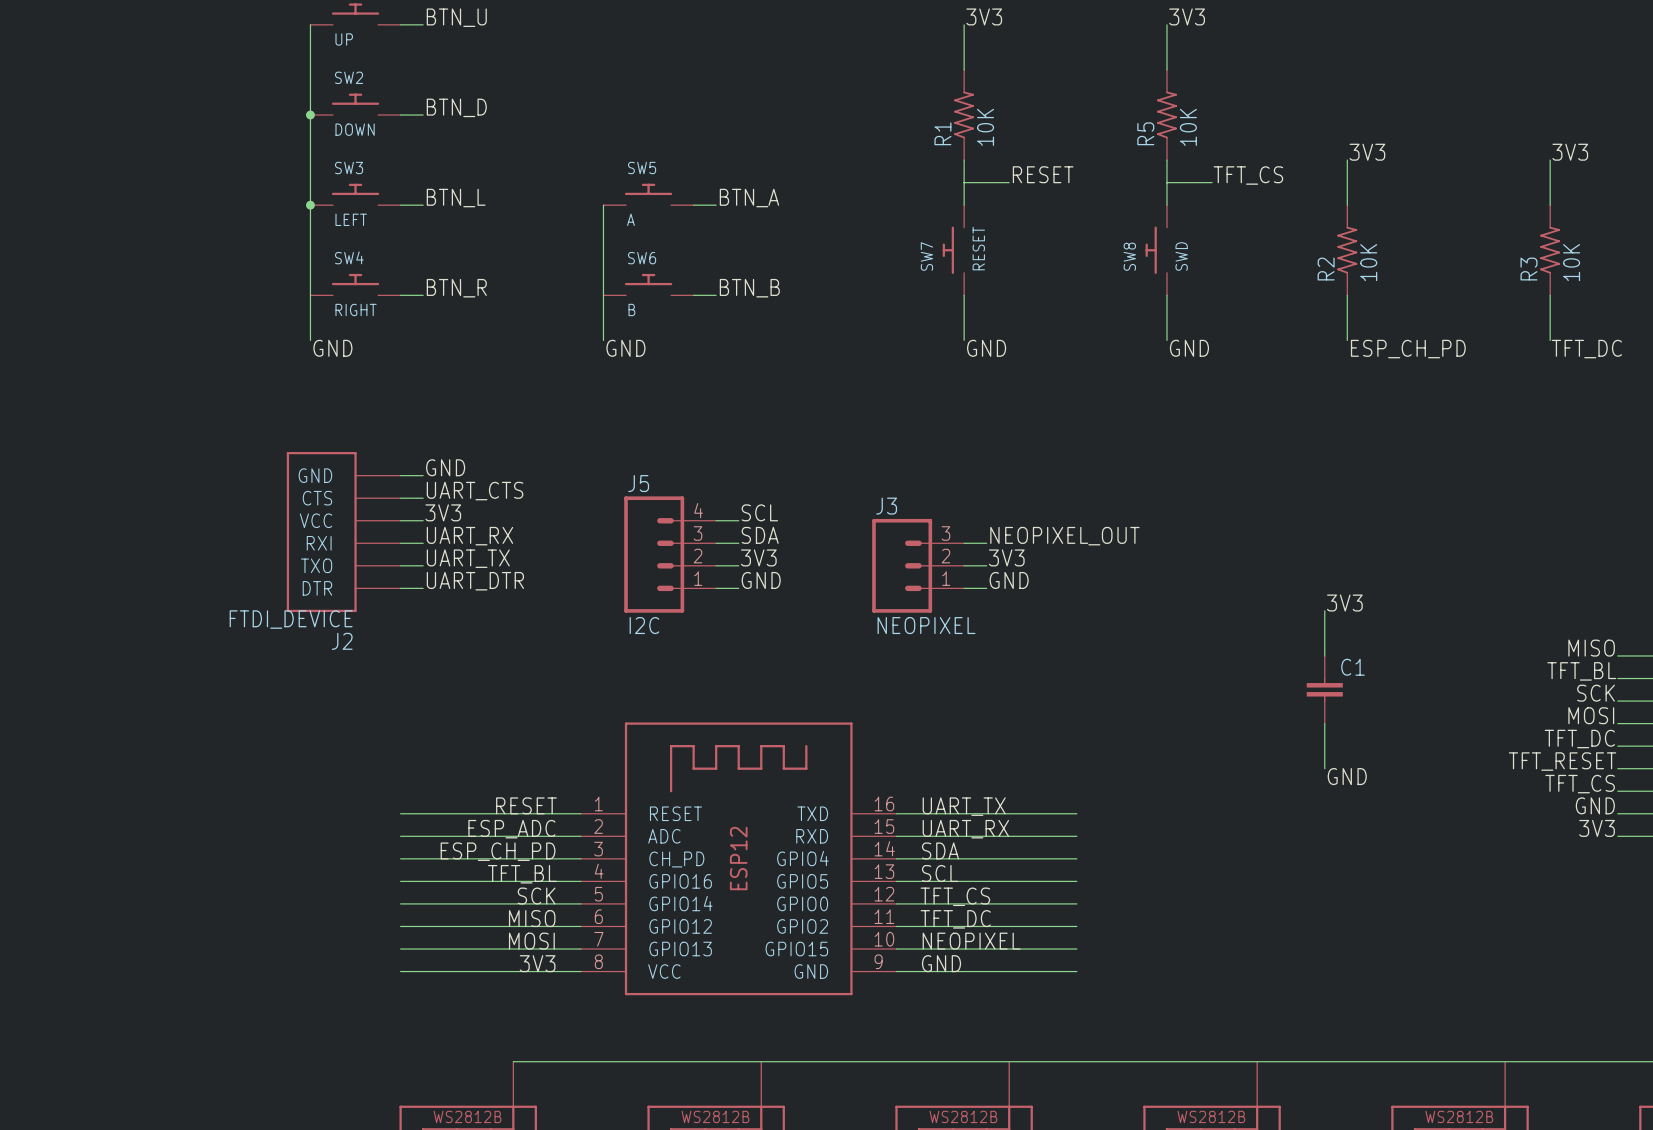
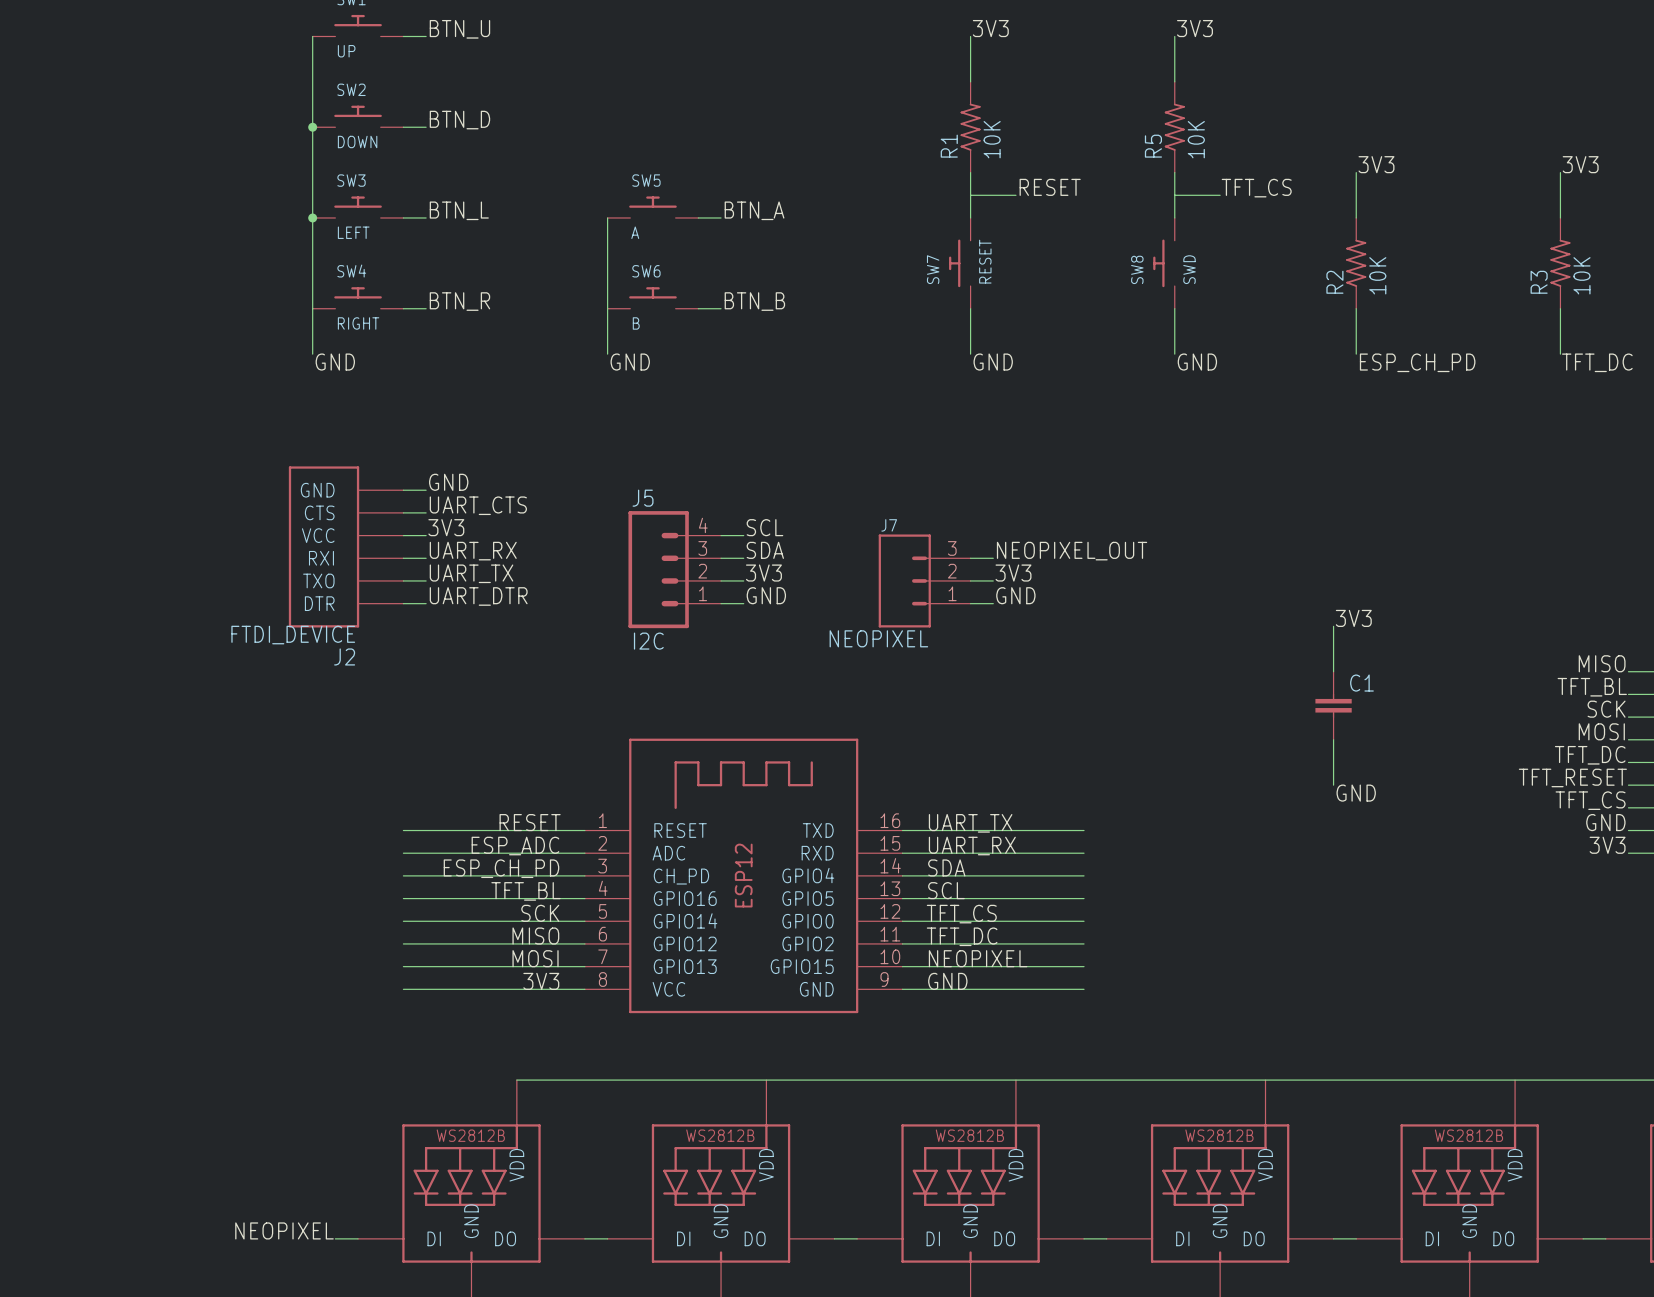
J3: NEOPIXEL (918, 565) -> none
J7: none -> NEOPIXEL (924, 580)

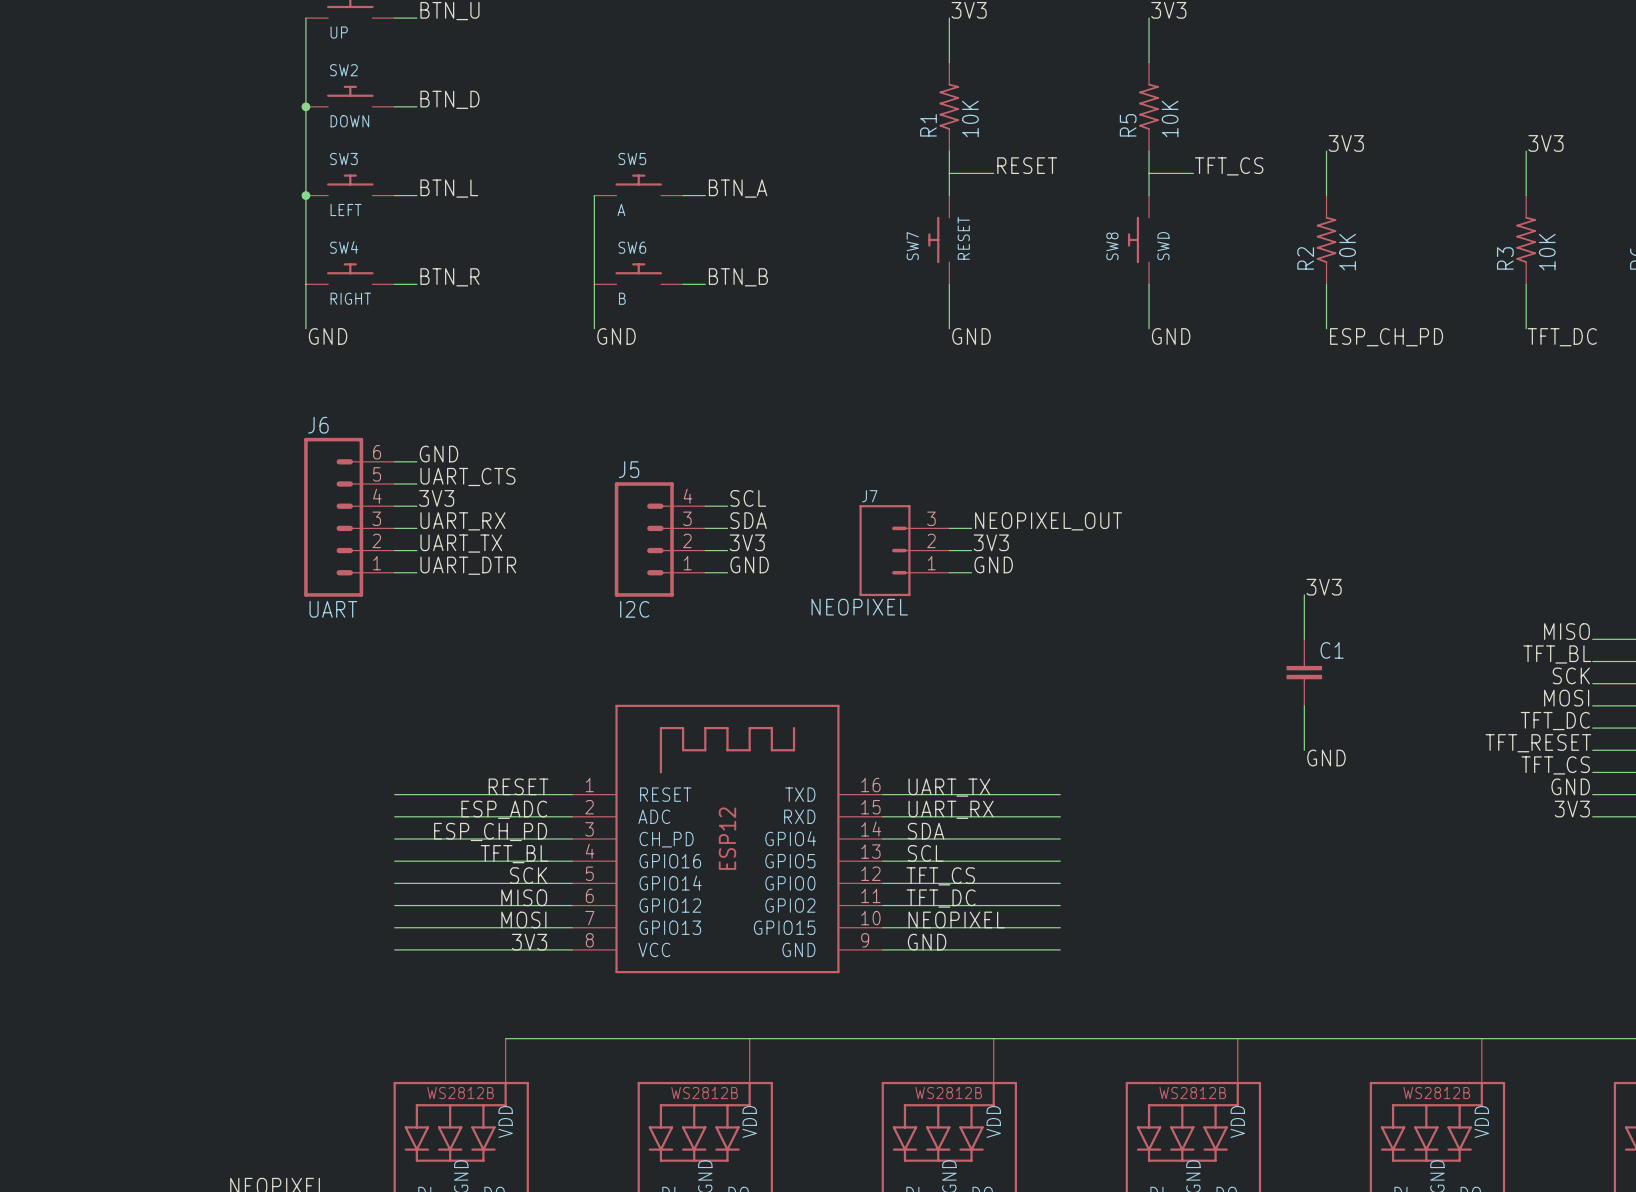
J2: FTDI_DEVICE (346, 546) -> none
J6: none -> UART (349, 517)

